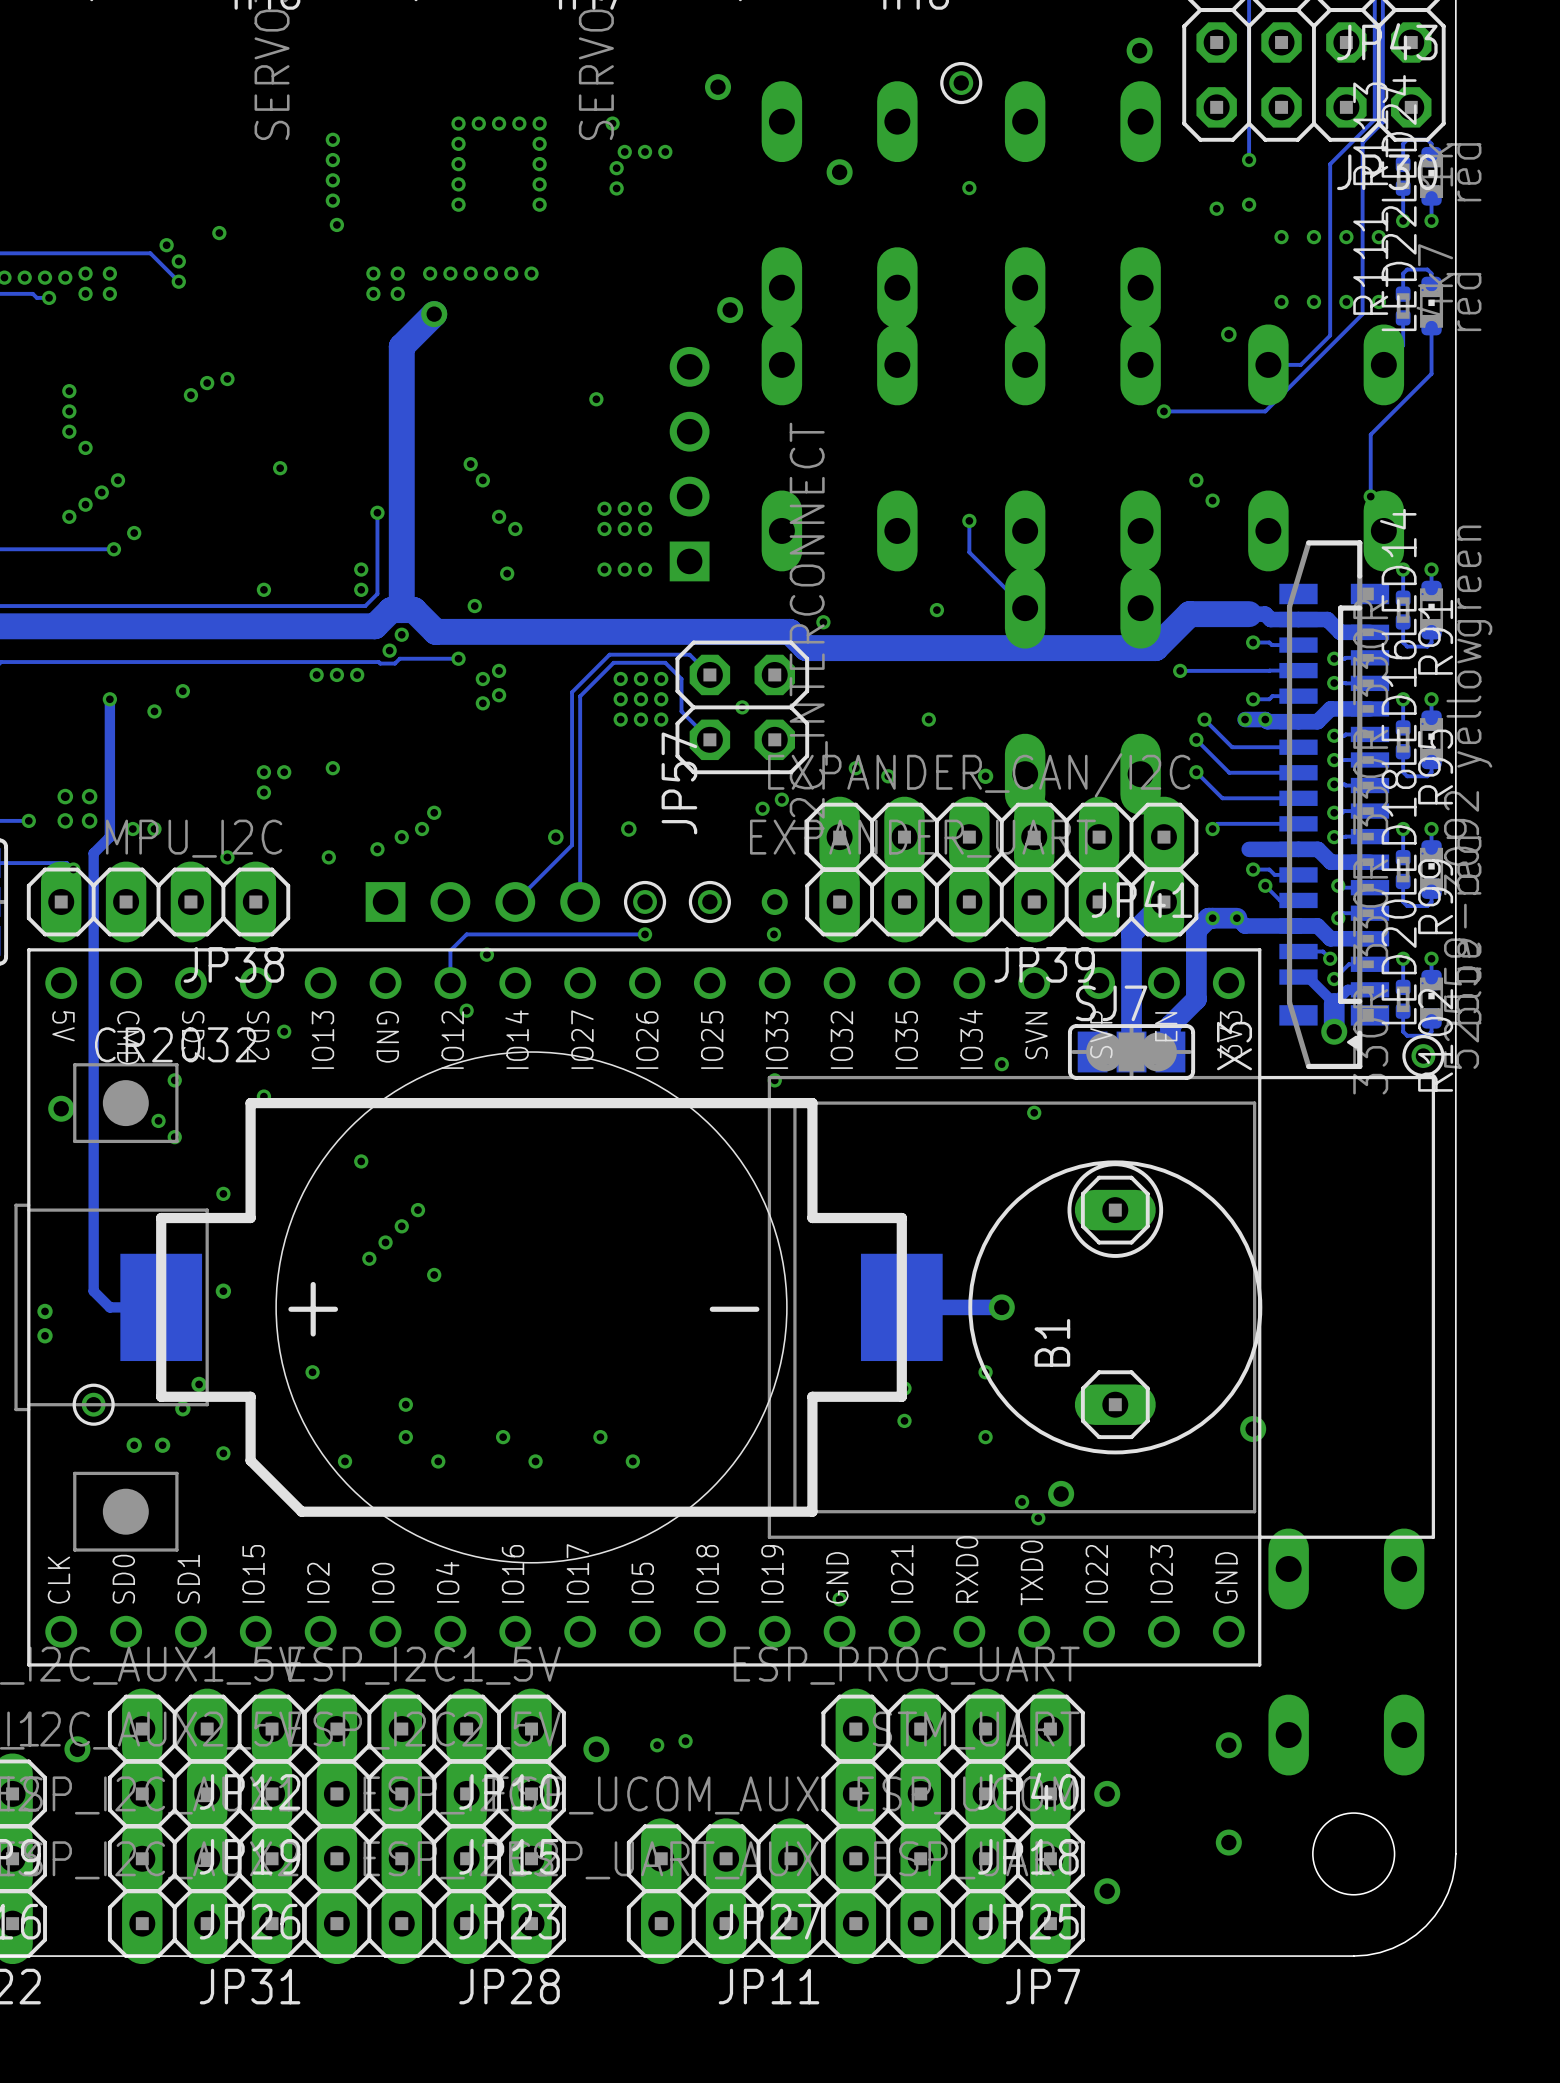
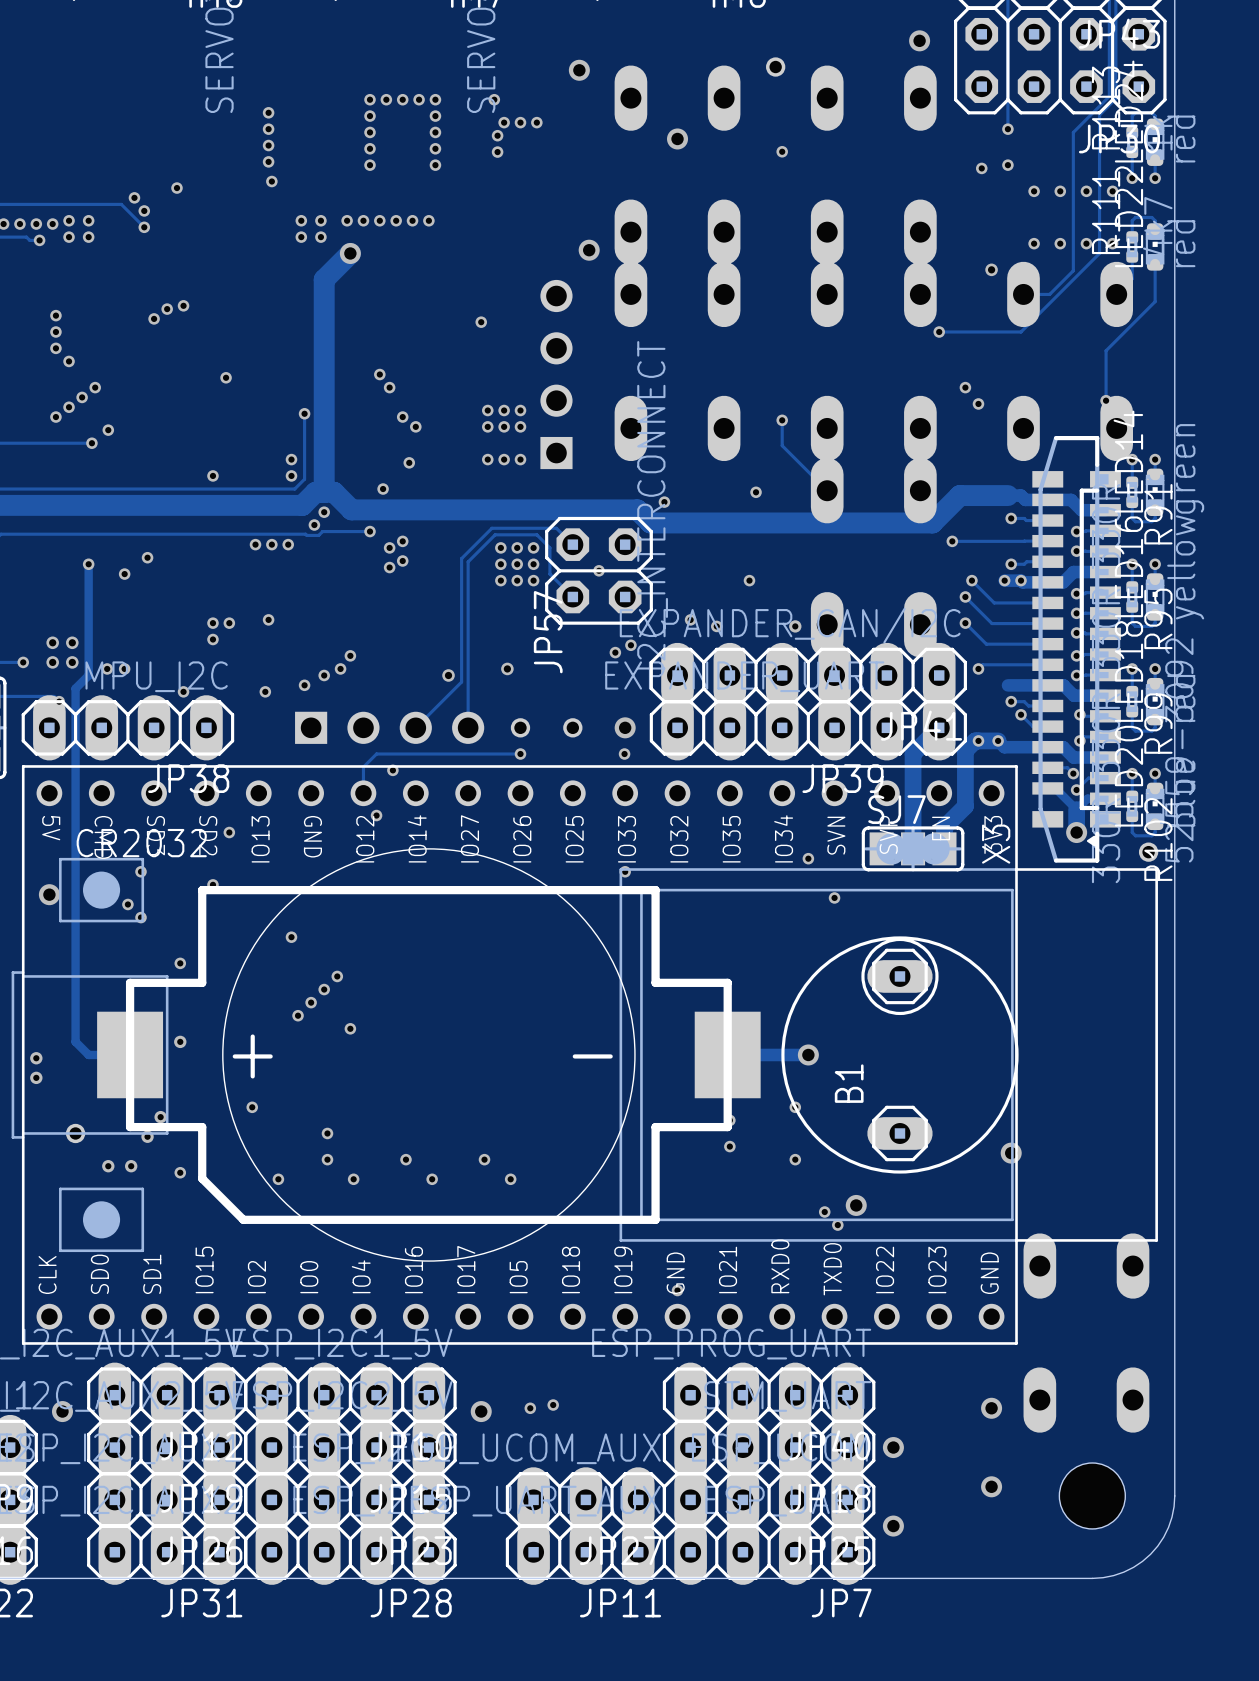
part footprint: [940, 61, 983, 105] -> [766, 57, 786, 77]
part footprint: [623, 880, 667, 924] -> [510, 718, 531, 738]
part footprint: [688, 880, 731, 924] -> [563, 718, 583, 738]
part footprint: [1402, 1034, 1445, 1078] -> [1138, 842, 1159, 862]
part footprint: [72, 1383, 115, 1426] -> [65, 1123, 86, 1144]

